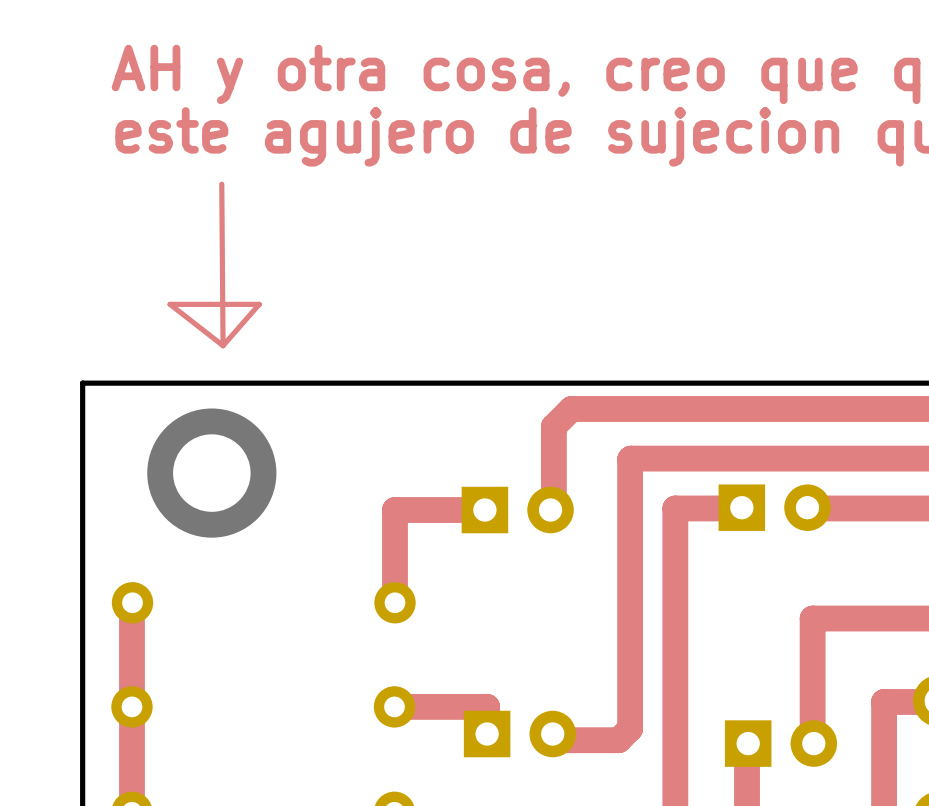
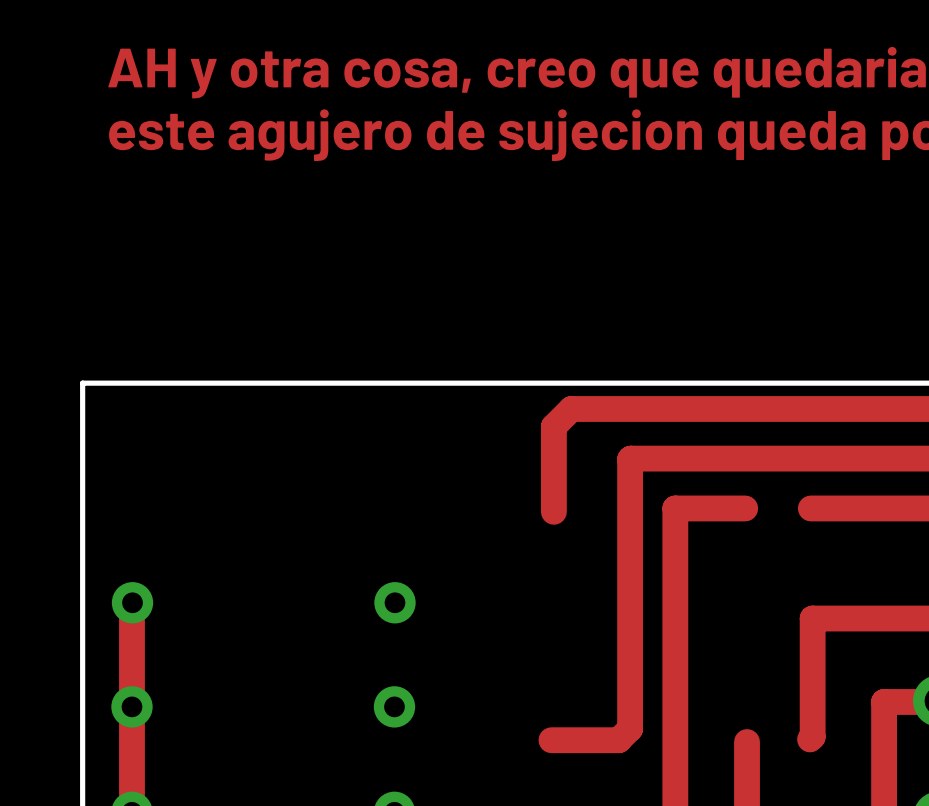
top track: (221, 184) (223, 345) -> none
top track: (223, 345) (170, 304) (259, 304) (223, 345) -> none
via: (211, 473) -> none
part: (774, 507) -> none
top track: (484, 510) (395, 510) (395, 602) -> none
part: (517, 510) -> none
top track: (394, 706) (487, 706) (487, 734) -> none
part: (519, 734) -> none
part: (781, 743) -> none

